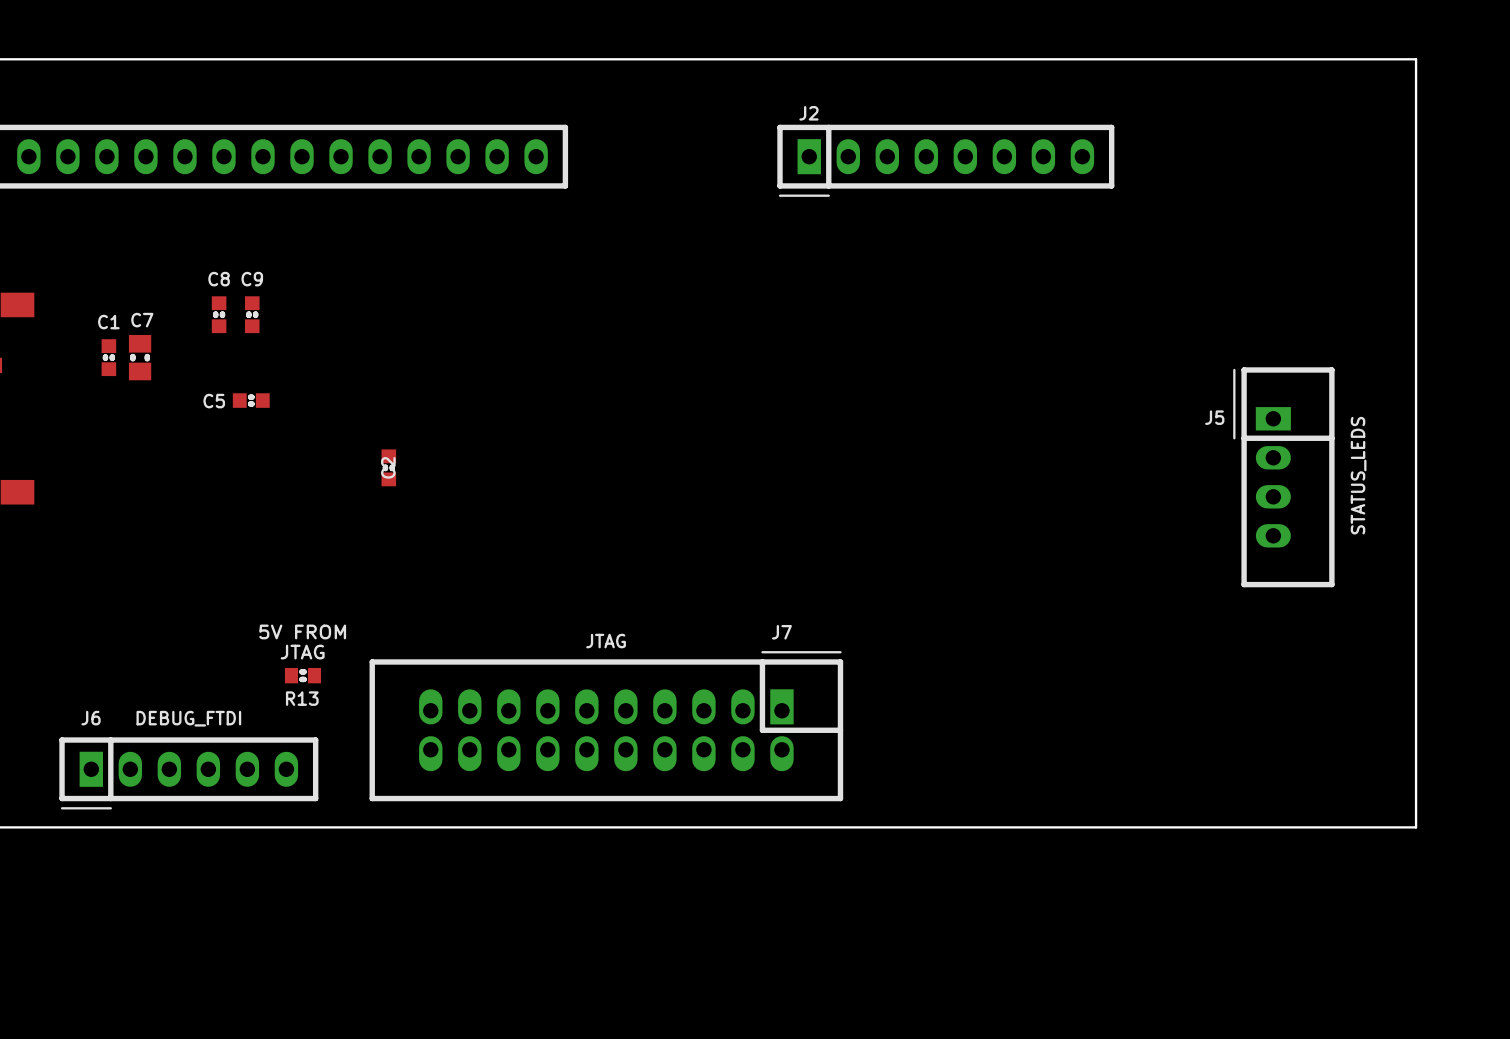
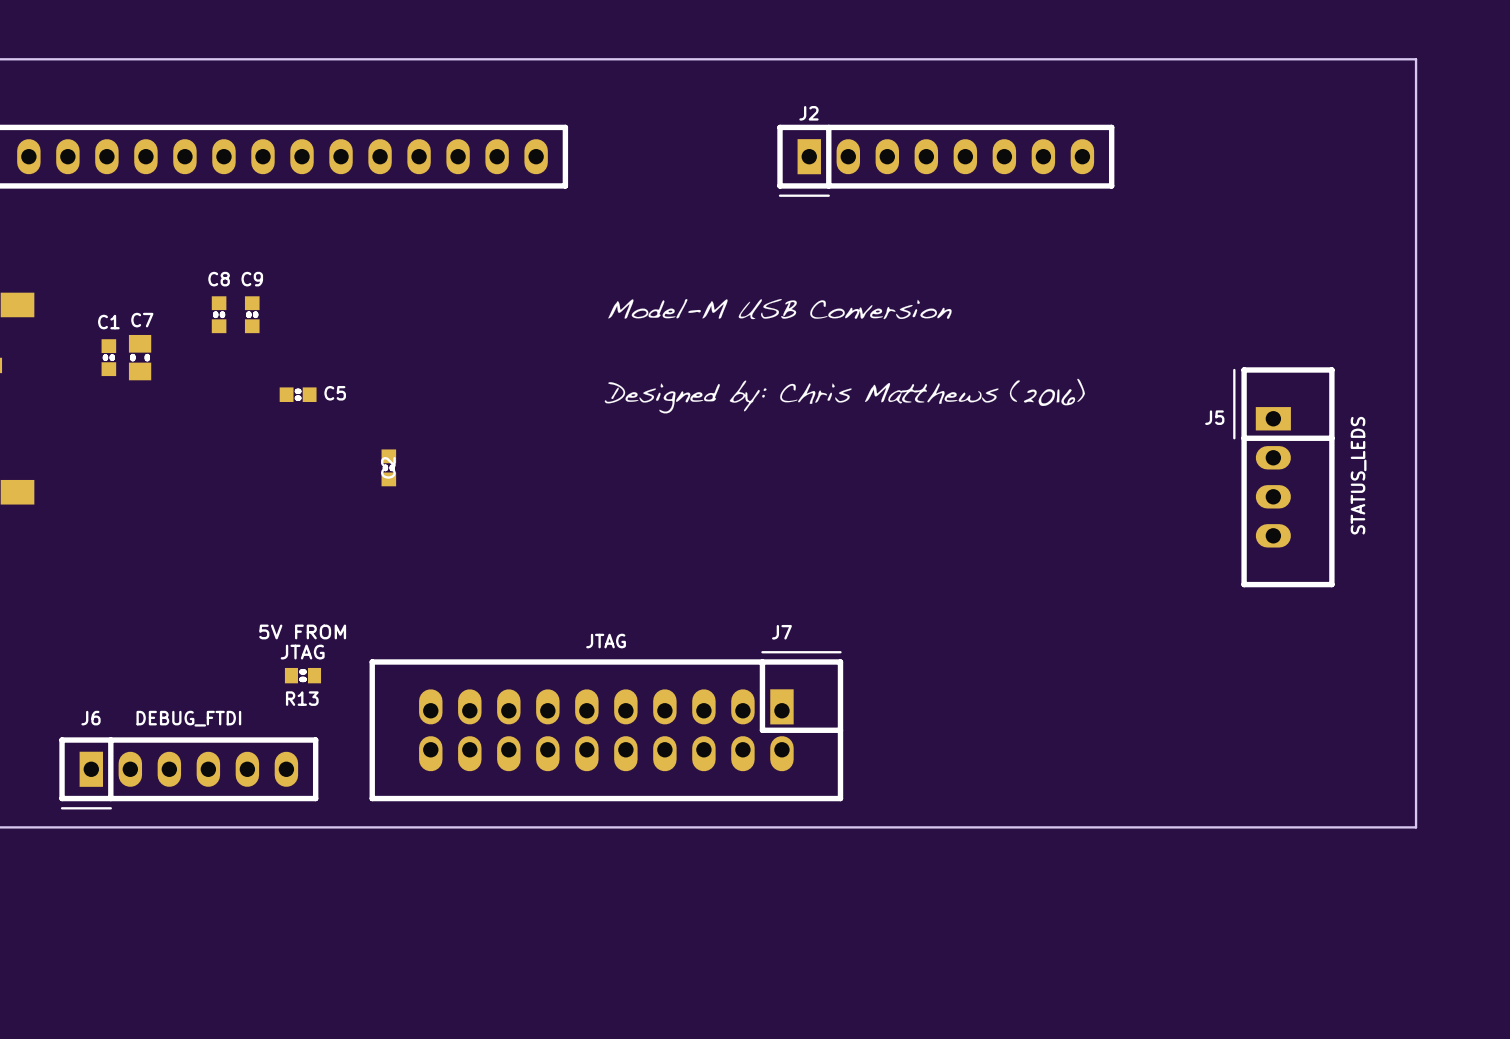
drawing: none -> [604, 299, 1086, 414]
C5 position: (251, 400) -> (298, 394)
C5 name position: C5 (214, 401) -> C5 (335, 393)

